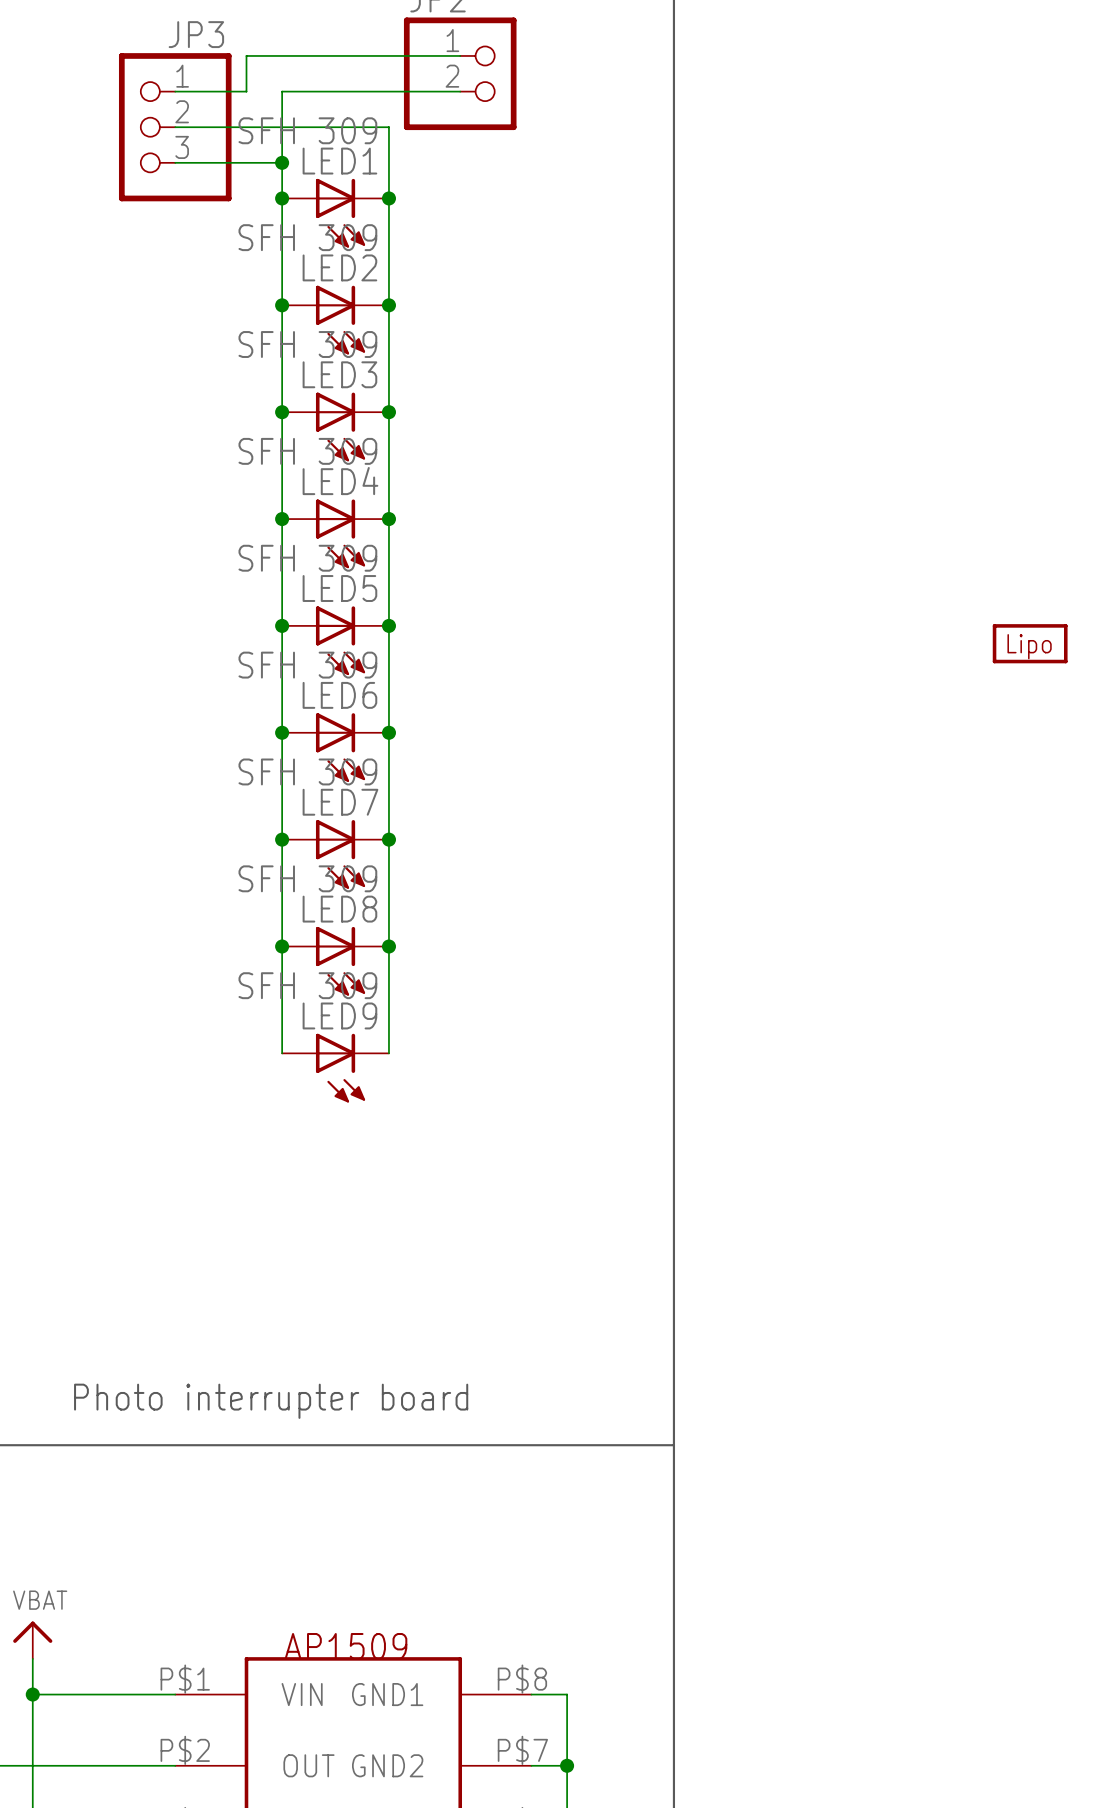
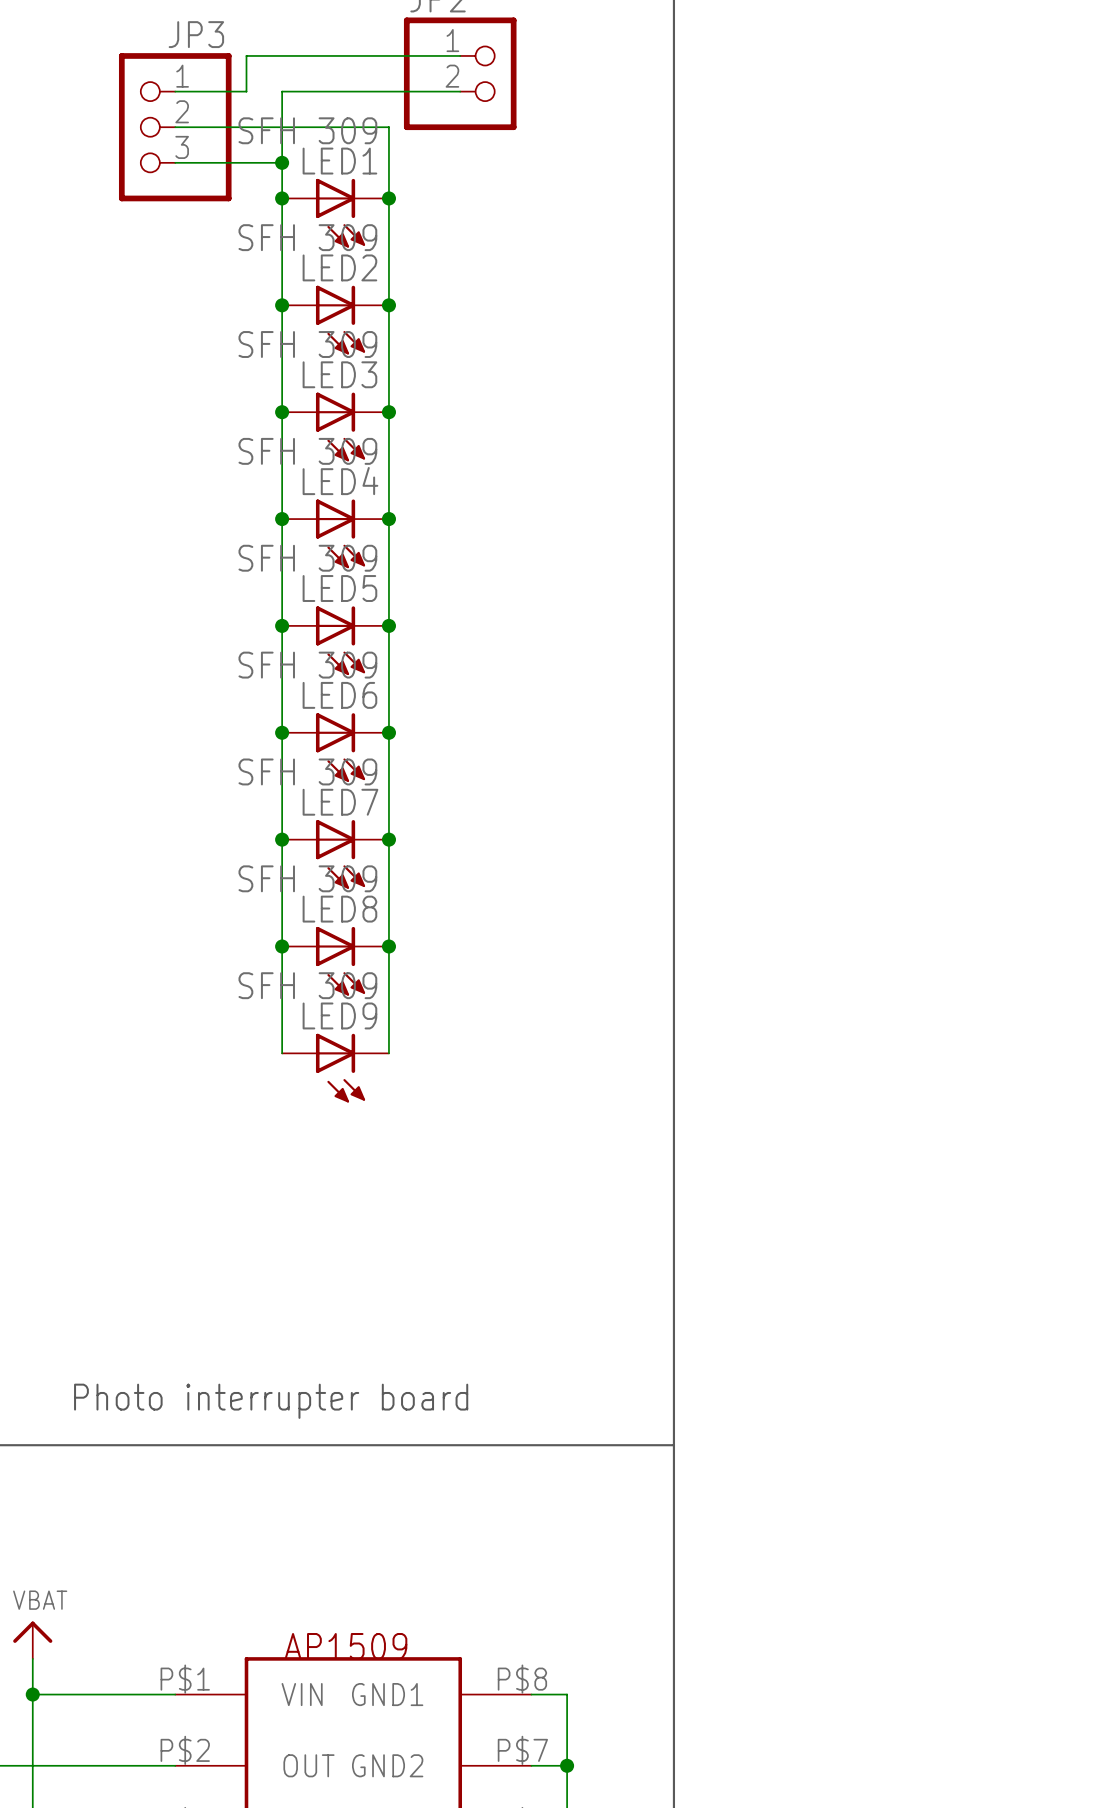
part: (1030, 643) -> none

